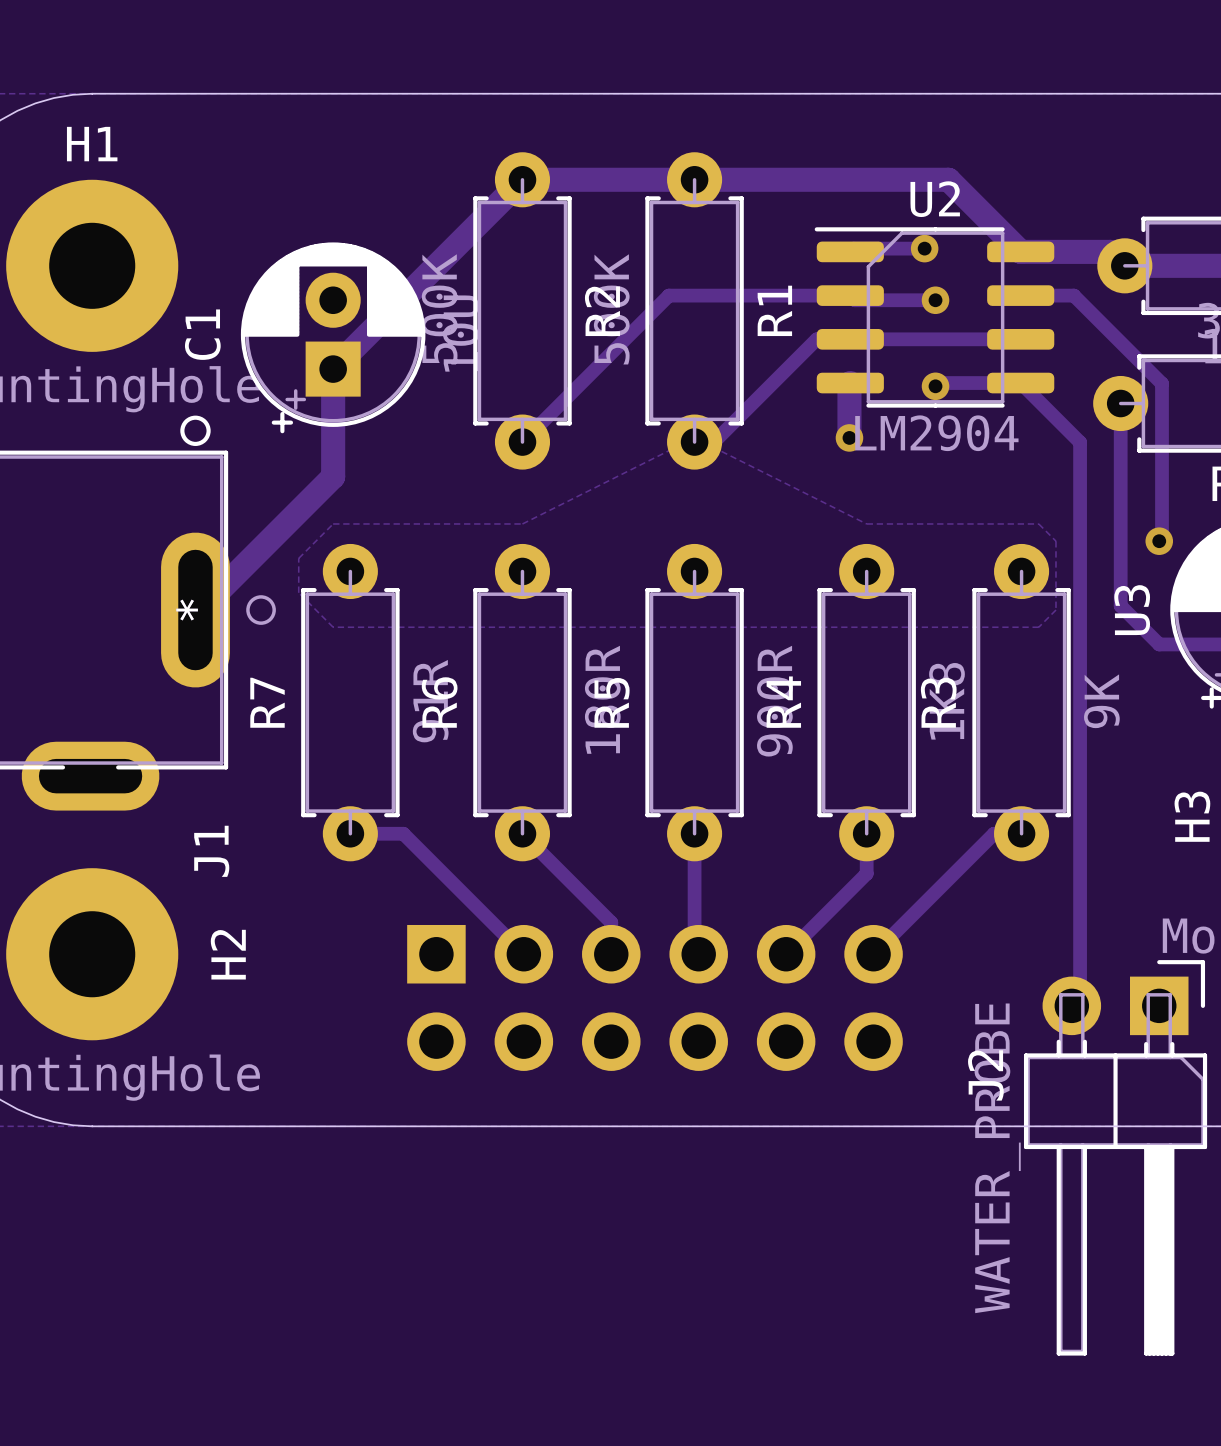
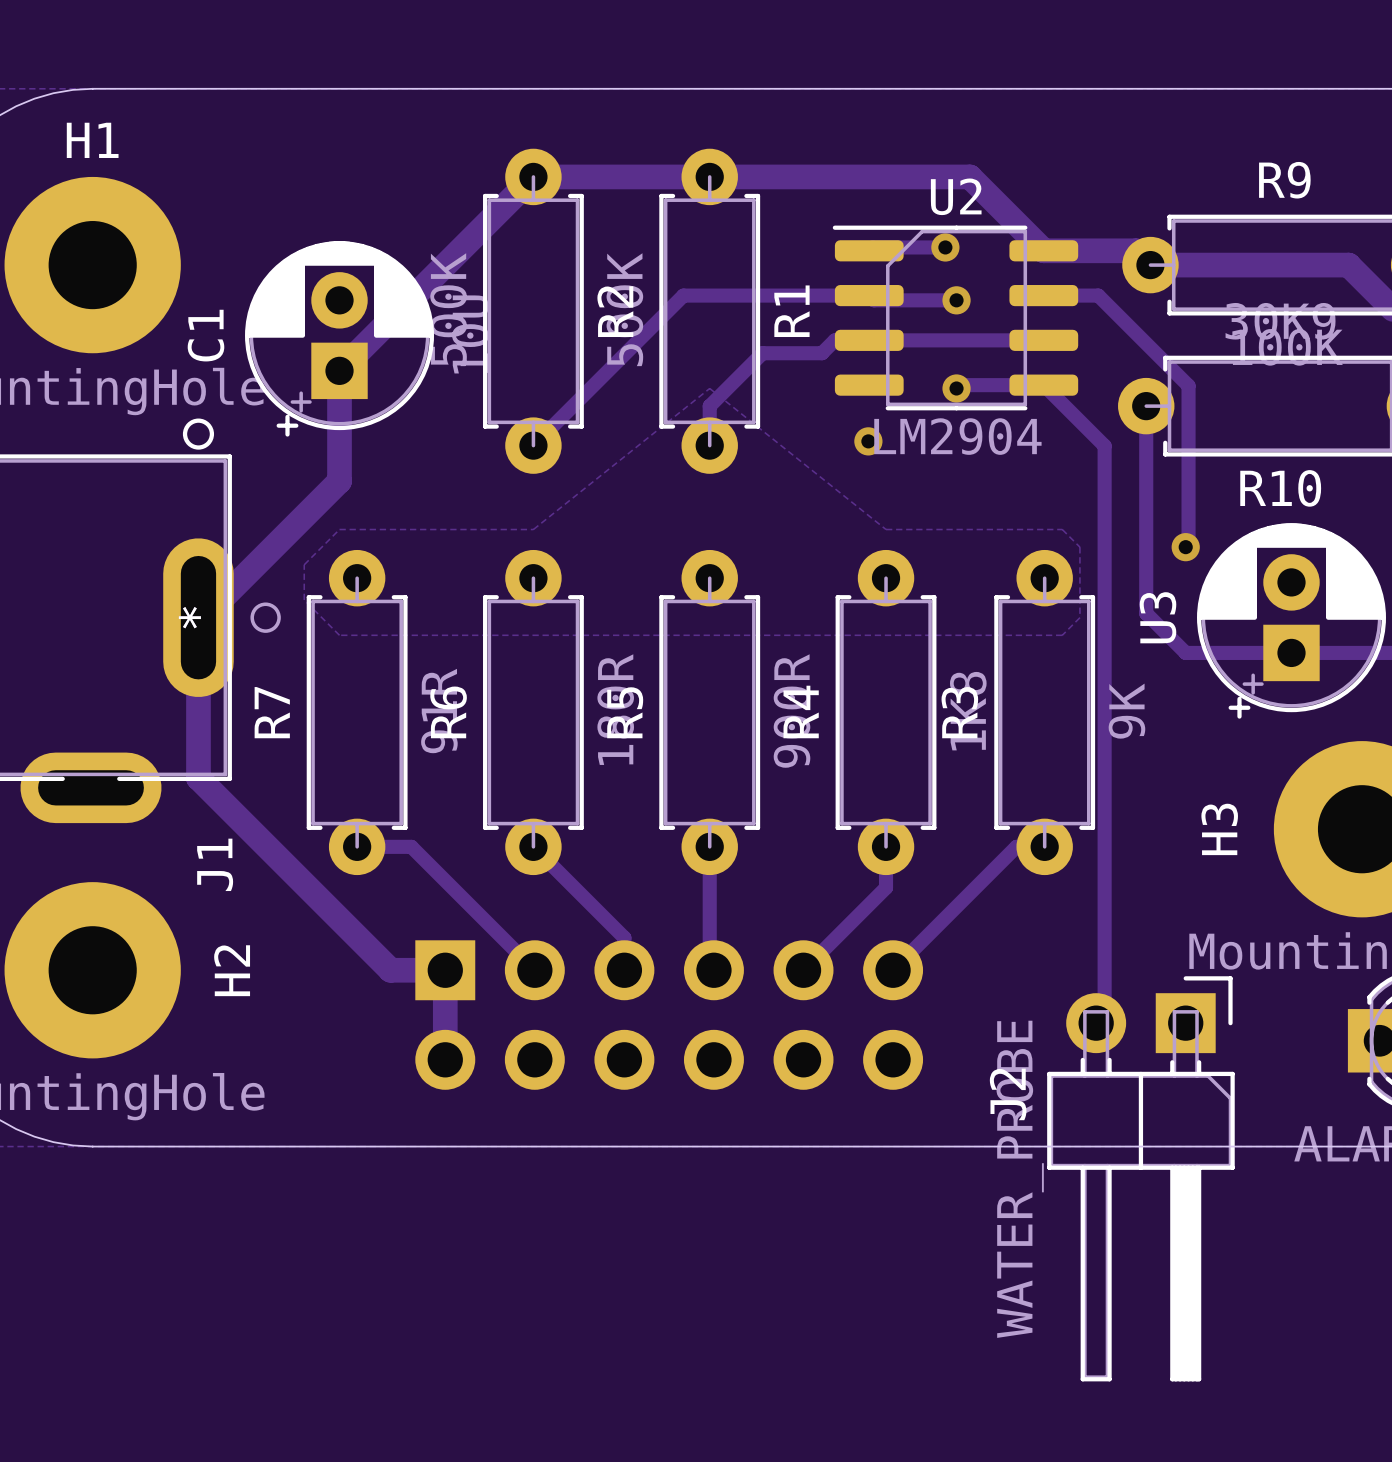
track: (804, 351) (714, 442) (694, 442) -> (822, 353) (762, 353) (709, 406) (709, 445)
track: (850, 383) (849, 437) -> none
zone outline: (522, 523) (694, 437) (866, 523) -> (533, 529) (709, 388) (886, 529)
track: none -> (198, 617) (198, 778) (390, 970) (445, 970) (445, 1059)

